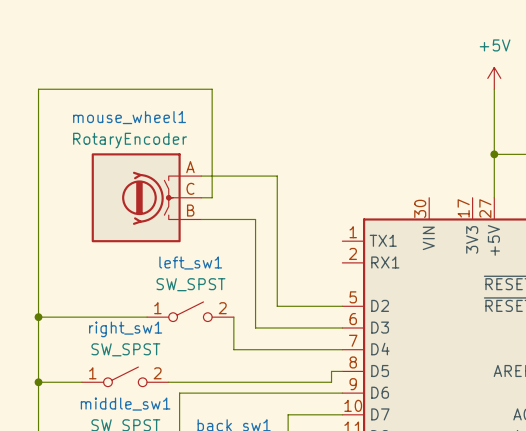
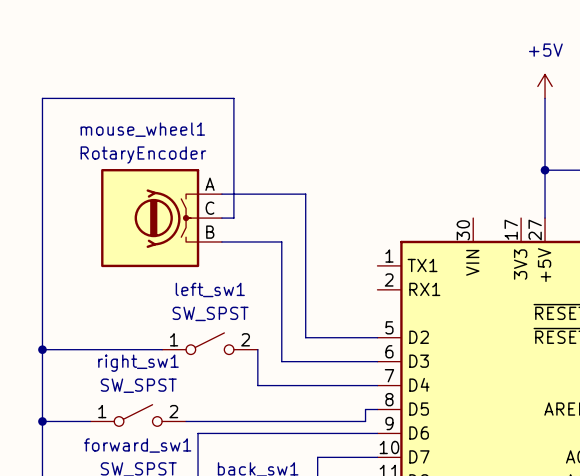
middle_sw1 name: middle_sw1 (125, 404) -> forward_sw1 (137, 445)

